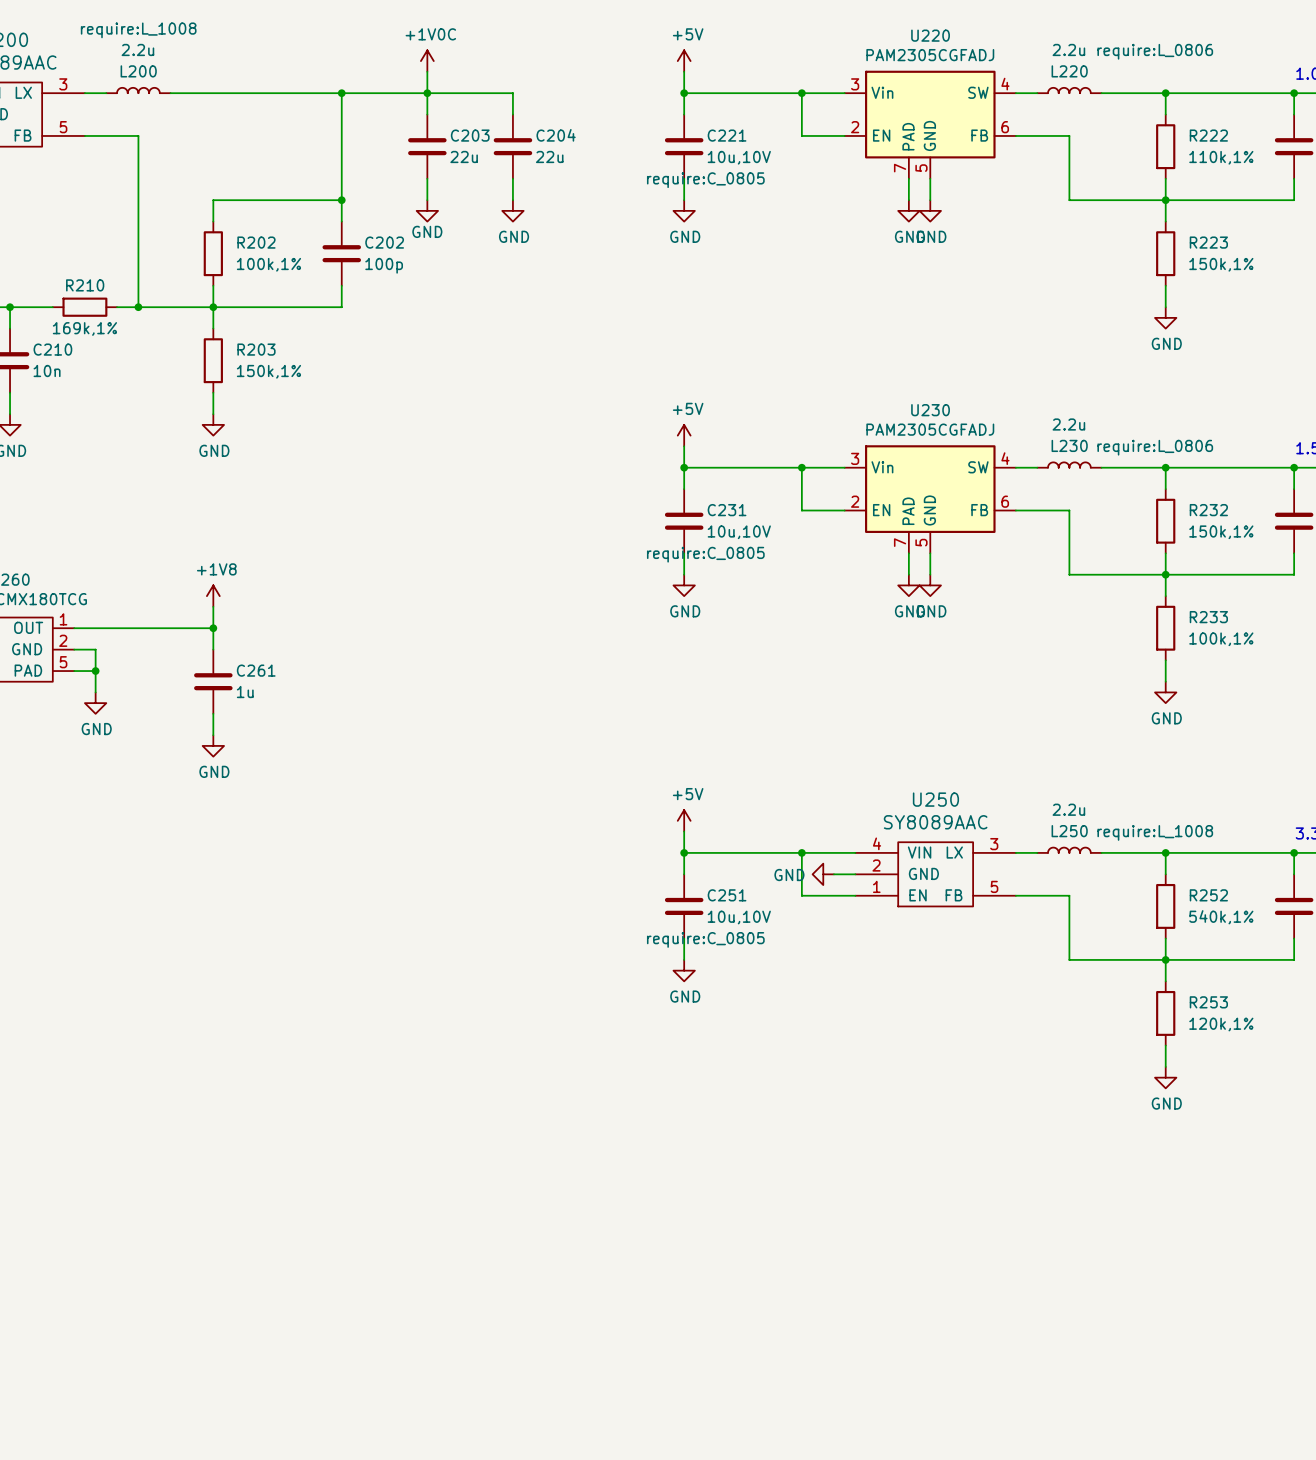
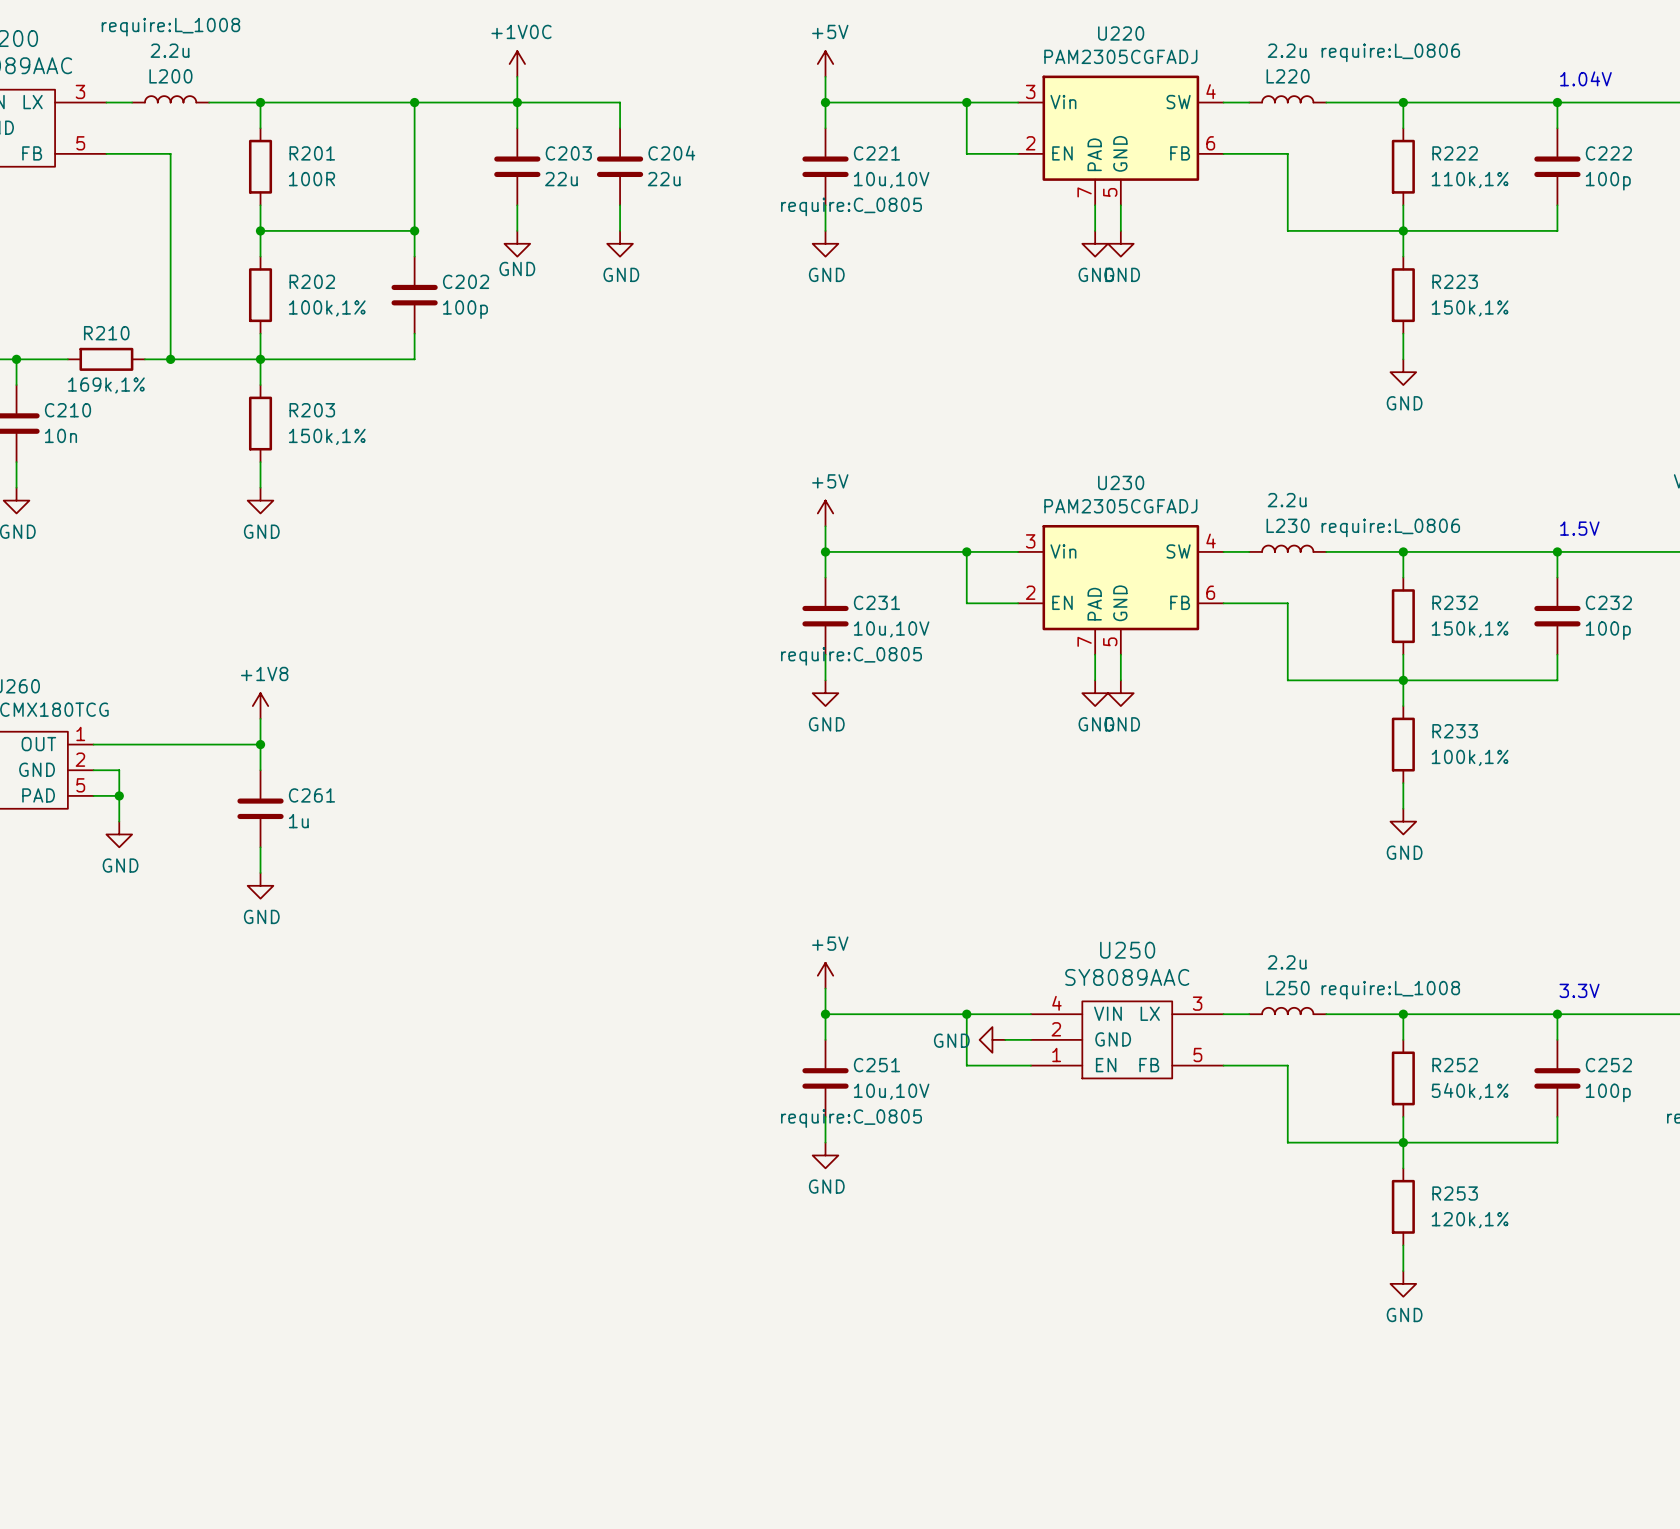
wire: none -> (260, 102) (260, 128)
junction: none -> (260, 102)
R201: none -> 100R (260, 166)
wire: none -> (260, 205) (260, 230)
junction: none -> (260, 230)

